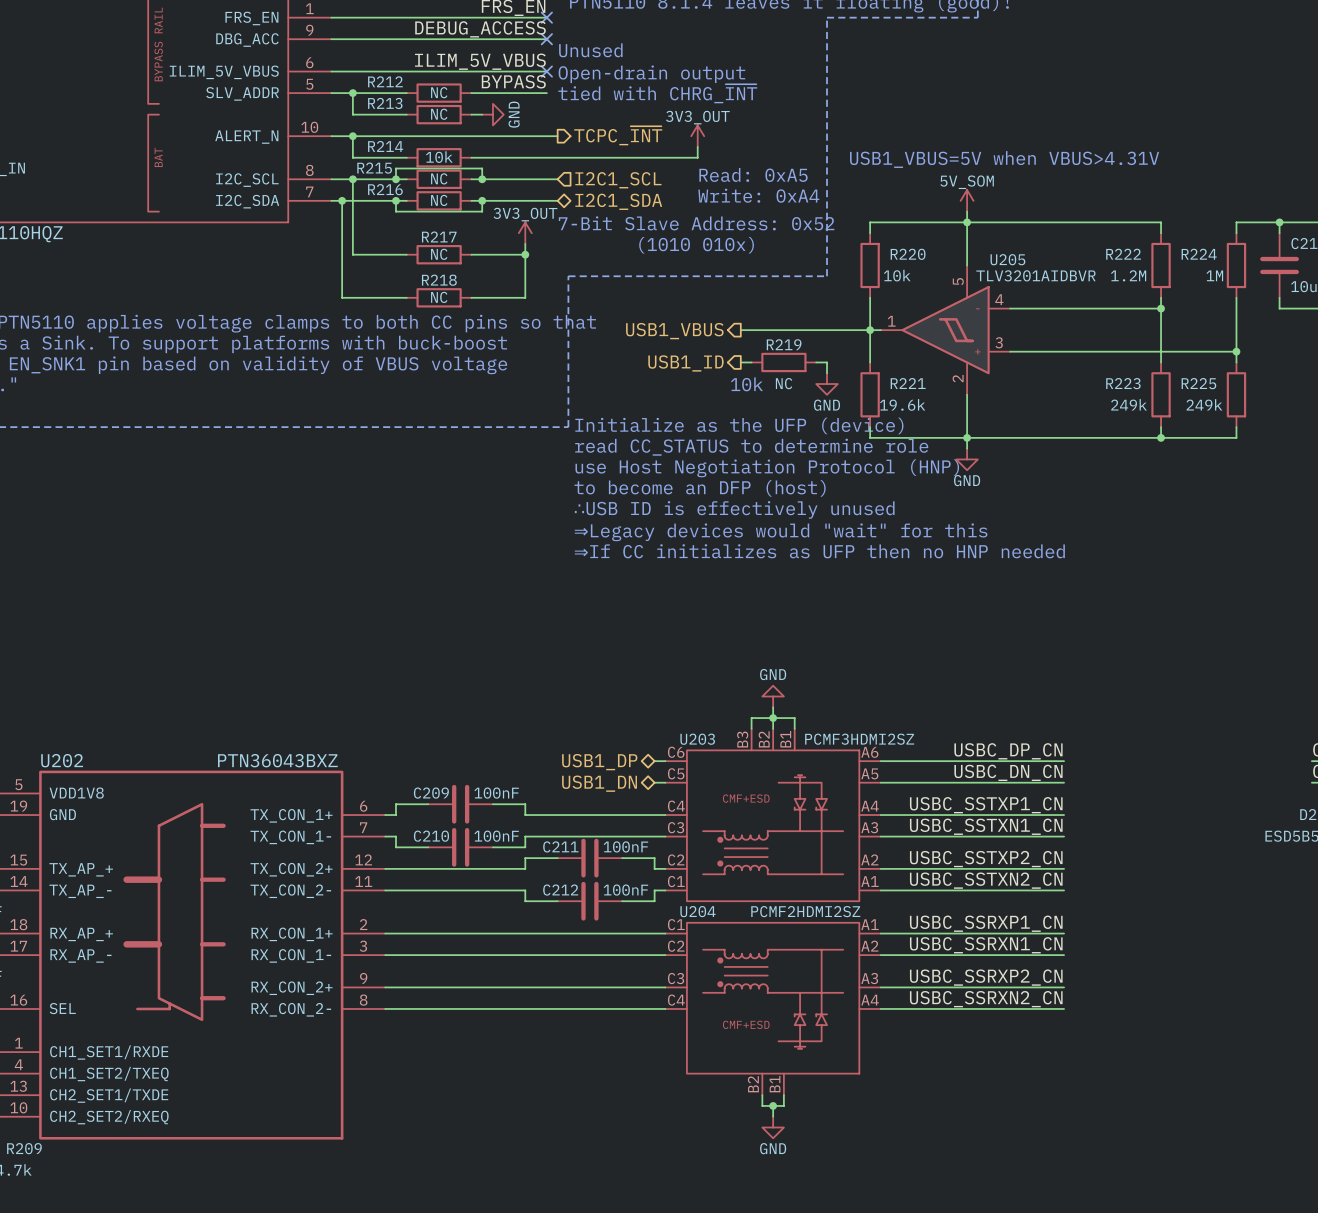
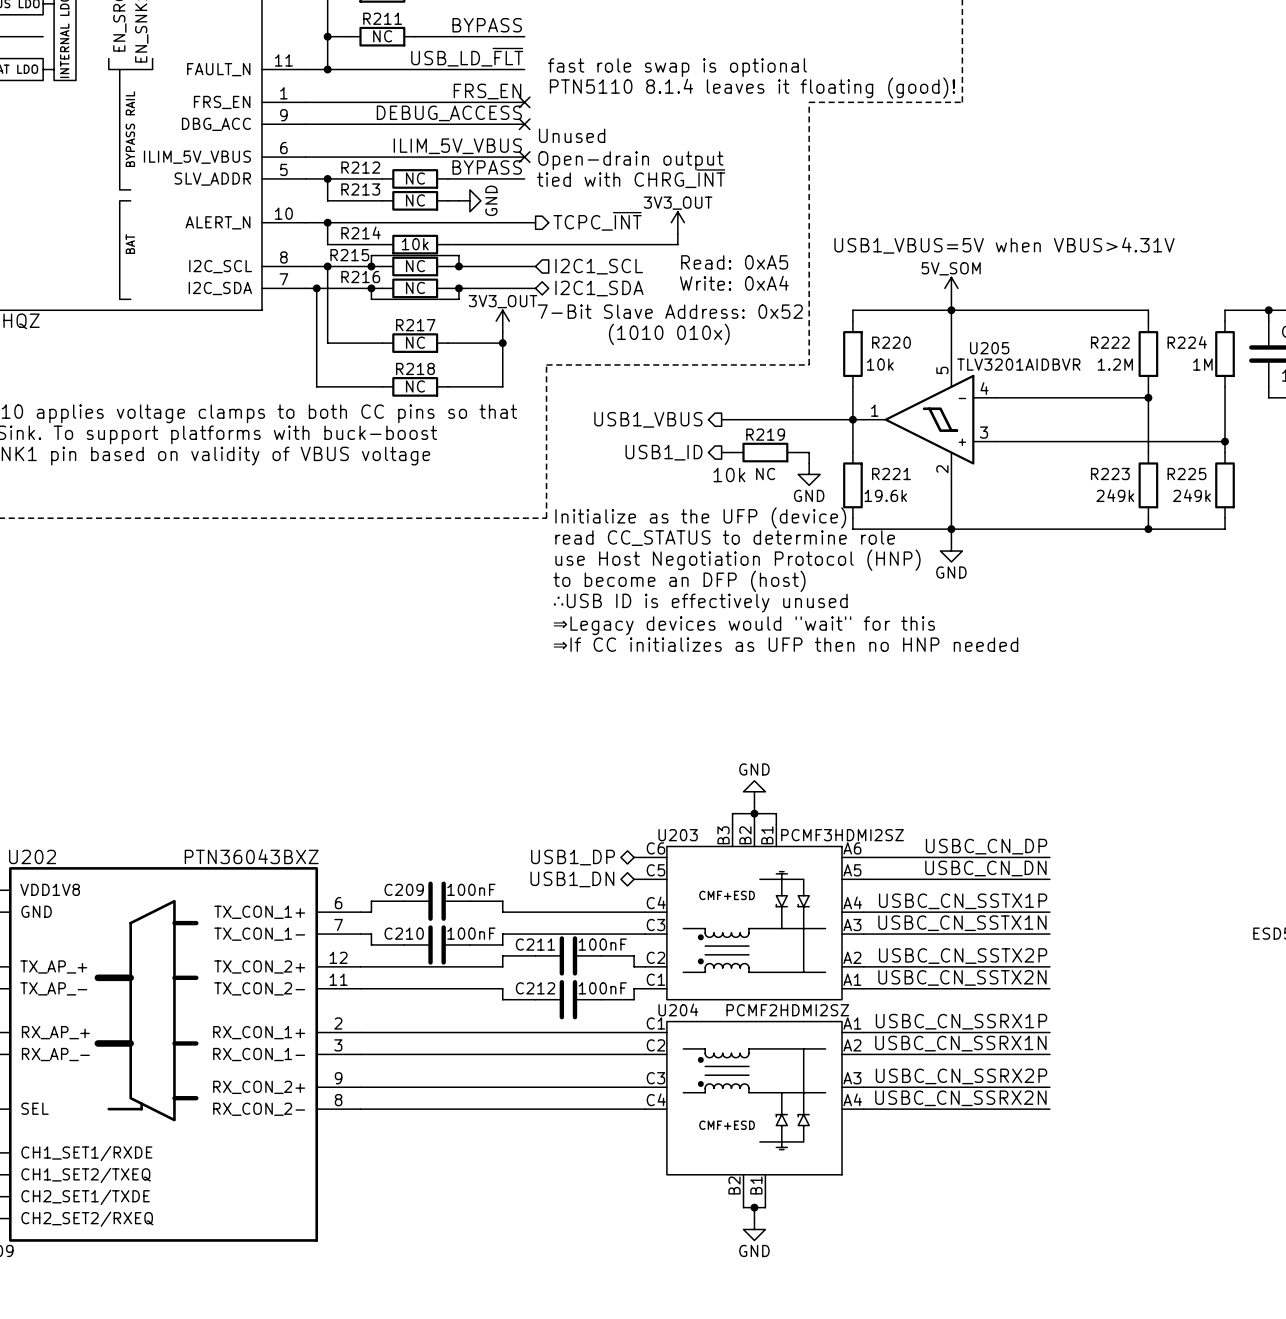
label: USBC_DP_CN (1008, 751) -> USBC_CN_DP (986, 846)
label: USBC_DN_CN (1008, 772) -> USBC_CN_DN (985, 868)
label: USBC_SSTXP1_CN (986, 805) -> USBC_CN_SSTX1P (963, 901)
label: USBC_SSTXN1_CN (986, 826) -> USBC_CN_SSTX1N (962, 923)
label: USBC_SSTXP2_CN (986, 859) -> USBC_CN_SSTX2P (963, 956)
label: USBC_SSTXN2_CN (986, 880) -> USBC_CN_SSTX2N (962, 977)
label: USBC_SSRXP1_CN (986, 923) -> USBC_CN_SSRX1P (961, 1021)
label: USBC_SSRXN1_CN (986, 945) -> USBC_CN_SSRX1N (960, 1043)
label: USBC_SSRXP2_CN (986, 977) -> USBC_CN_SSRX2P (961, 1076)
label: USBC_SSRXN2_CN (986, 999) -> USBC_CN_SSRX2N (960, 1098)

